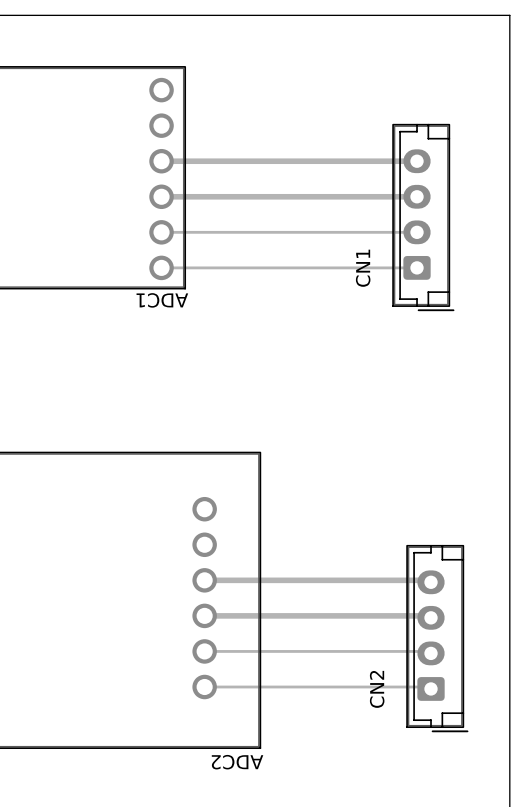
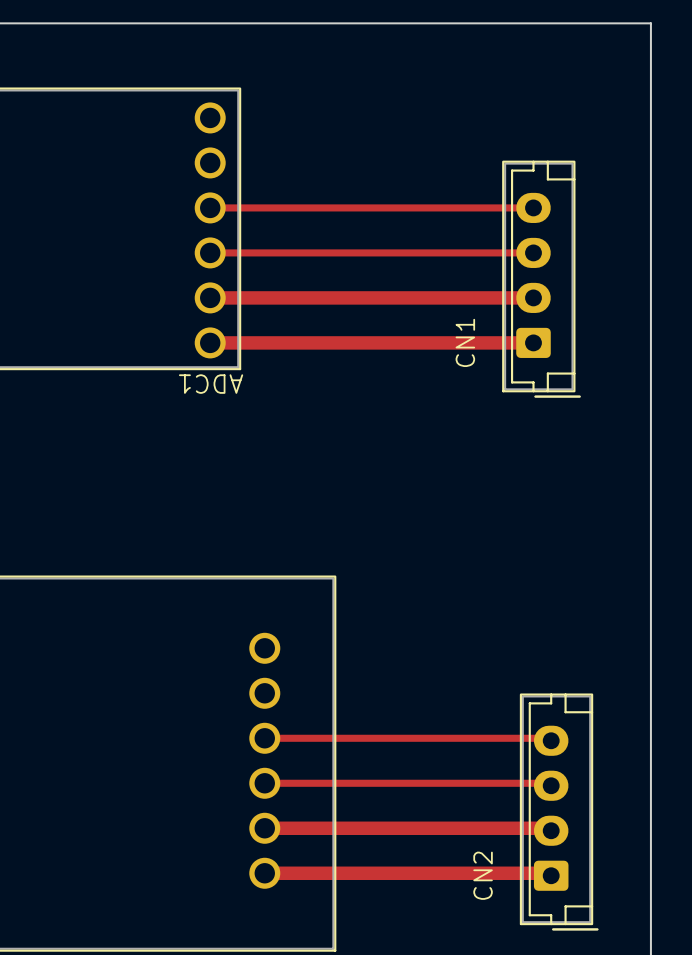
track width: thin (161, 232) (417, 232) -> thick (210, 297) (533, 297)
track width: thin (161, 267) (417, 267) -> thick (210, 342) (533, 342)
track width: thin (204, 651) (429, 651) -> thick (264, 828) (548, 828)
track width: thin (204, 687) (429, 687) -> thick (264, 873) (548, 873)

